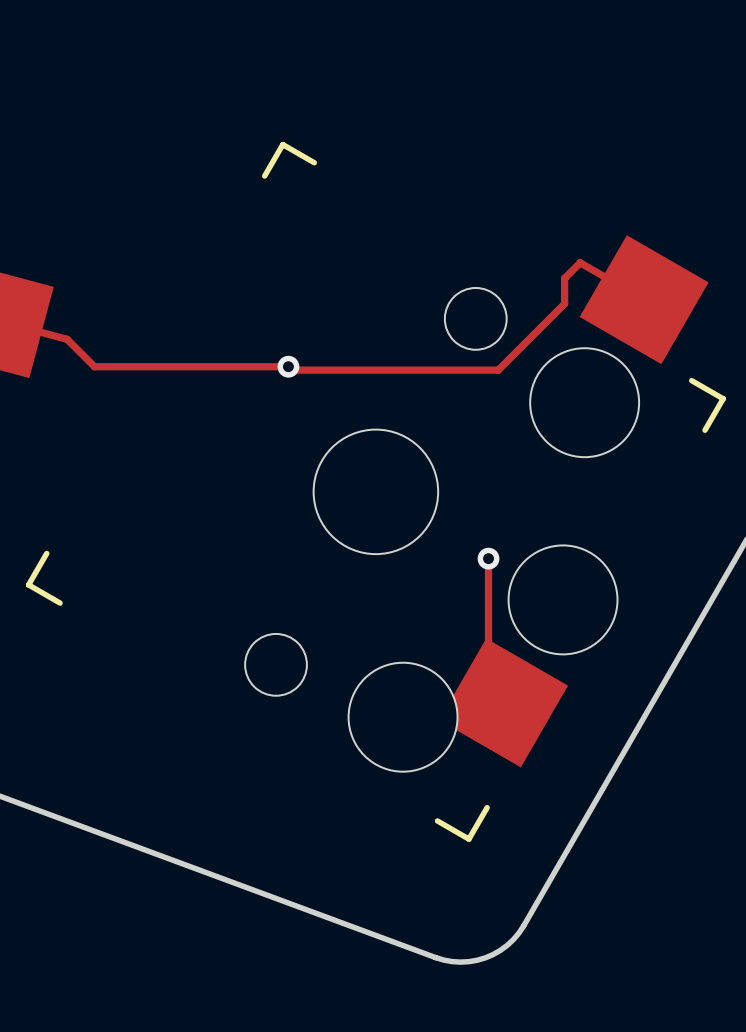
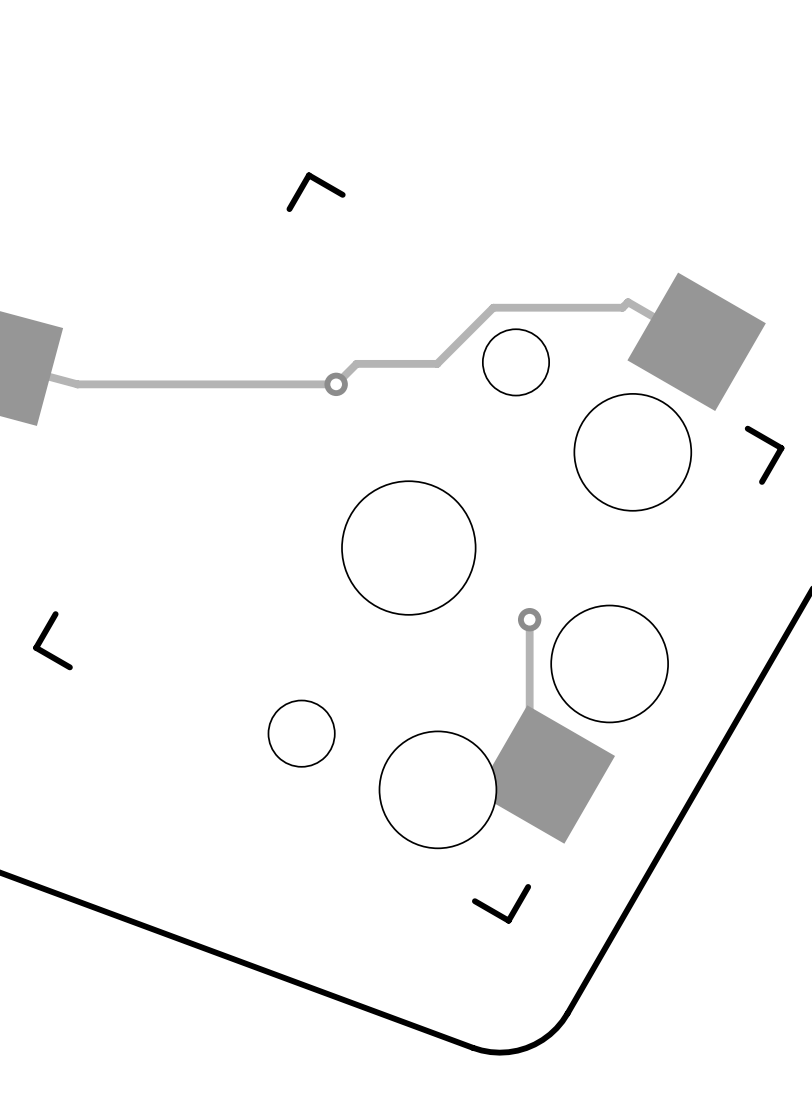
track: (575, 267) (564, 278) (564, 303) (498, 370) (291, 370) (288, 366) (94, 366) (67, 339) -> (622, 307) (493, 307) (437, 363) (356, 363) (336, 384) (77, 384)
via position: (288, 366) -> (336, 384)

